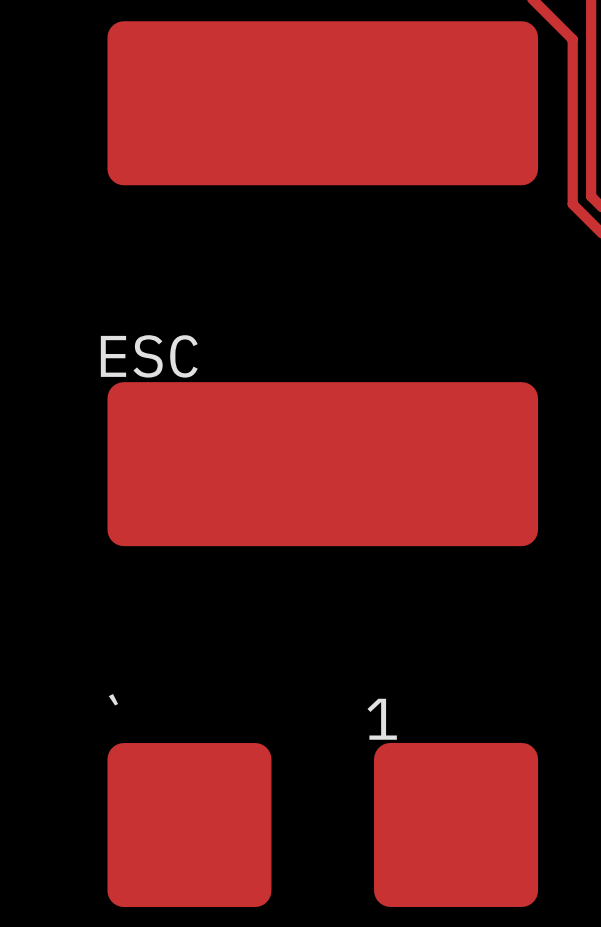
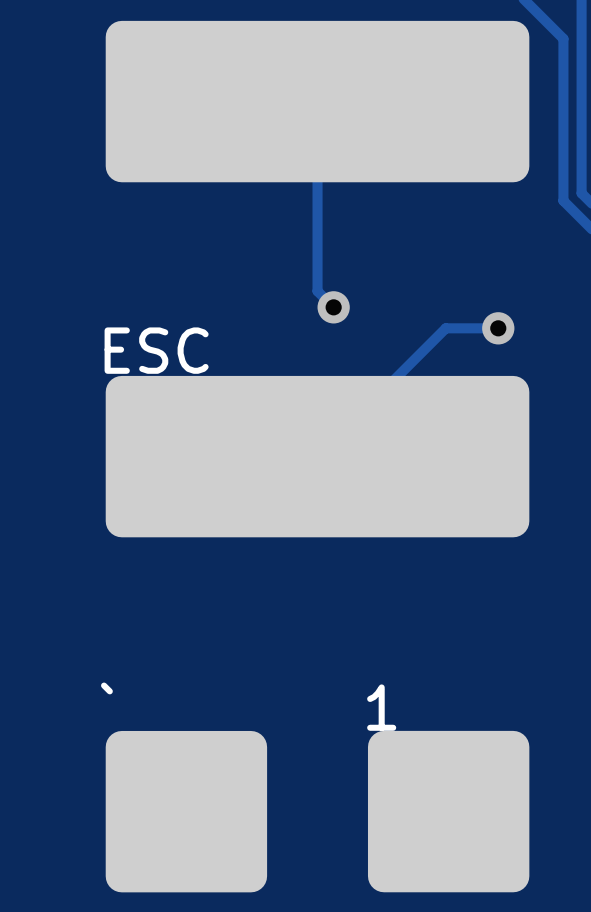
track: none -> (317, 101) (317, 291) (333, 307)
via: none -> (333, 307)
track: none -> (498, 328) (445, 328) (317, 456)
via: none -> (498, 328)

